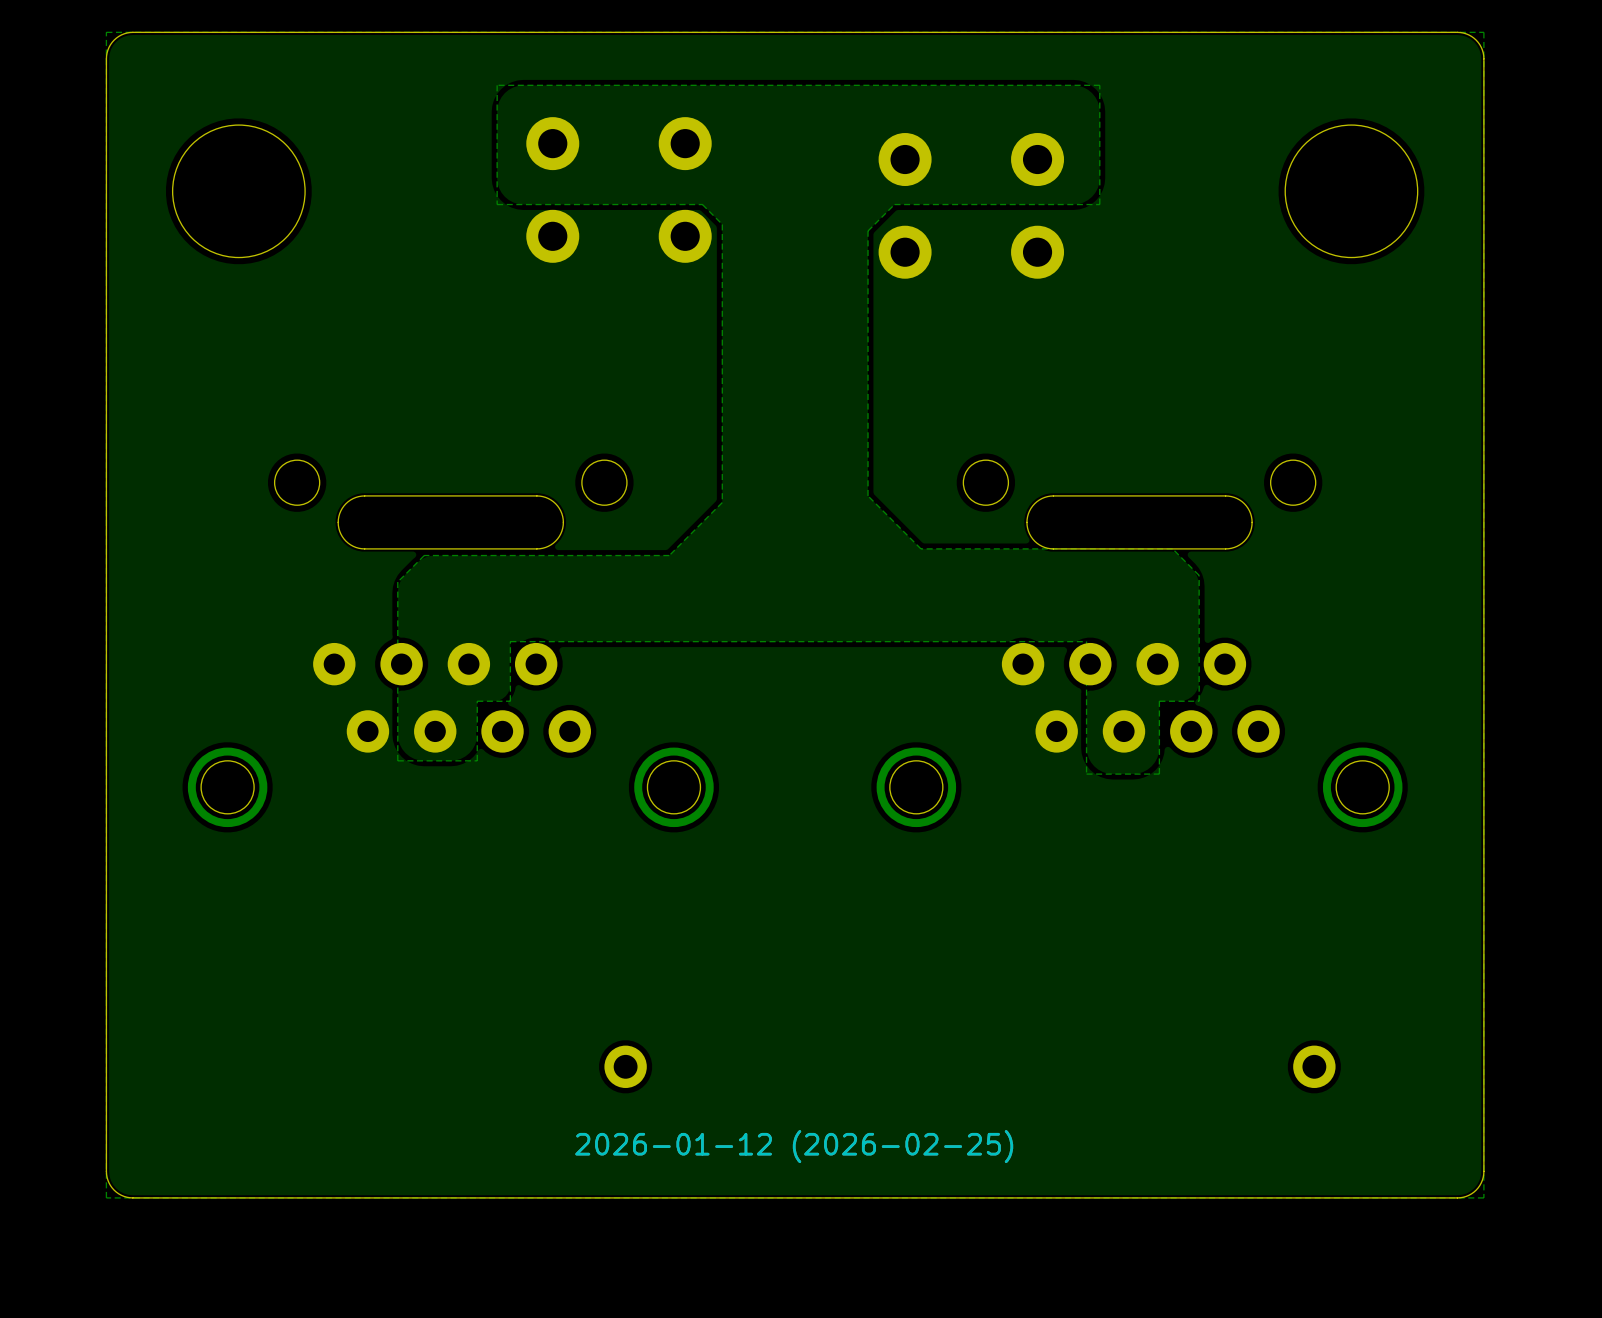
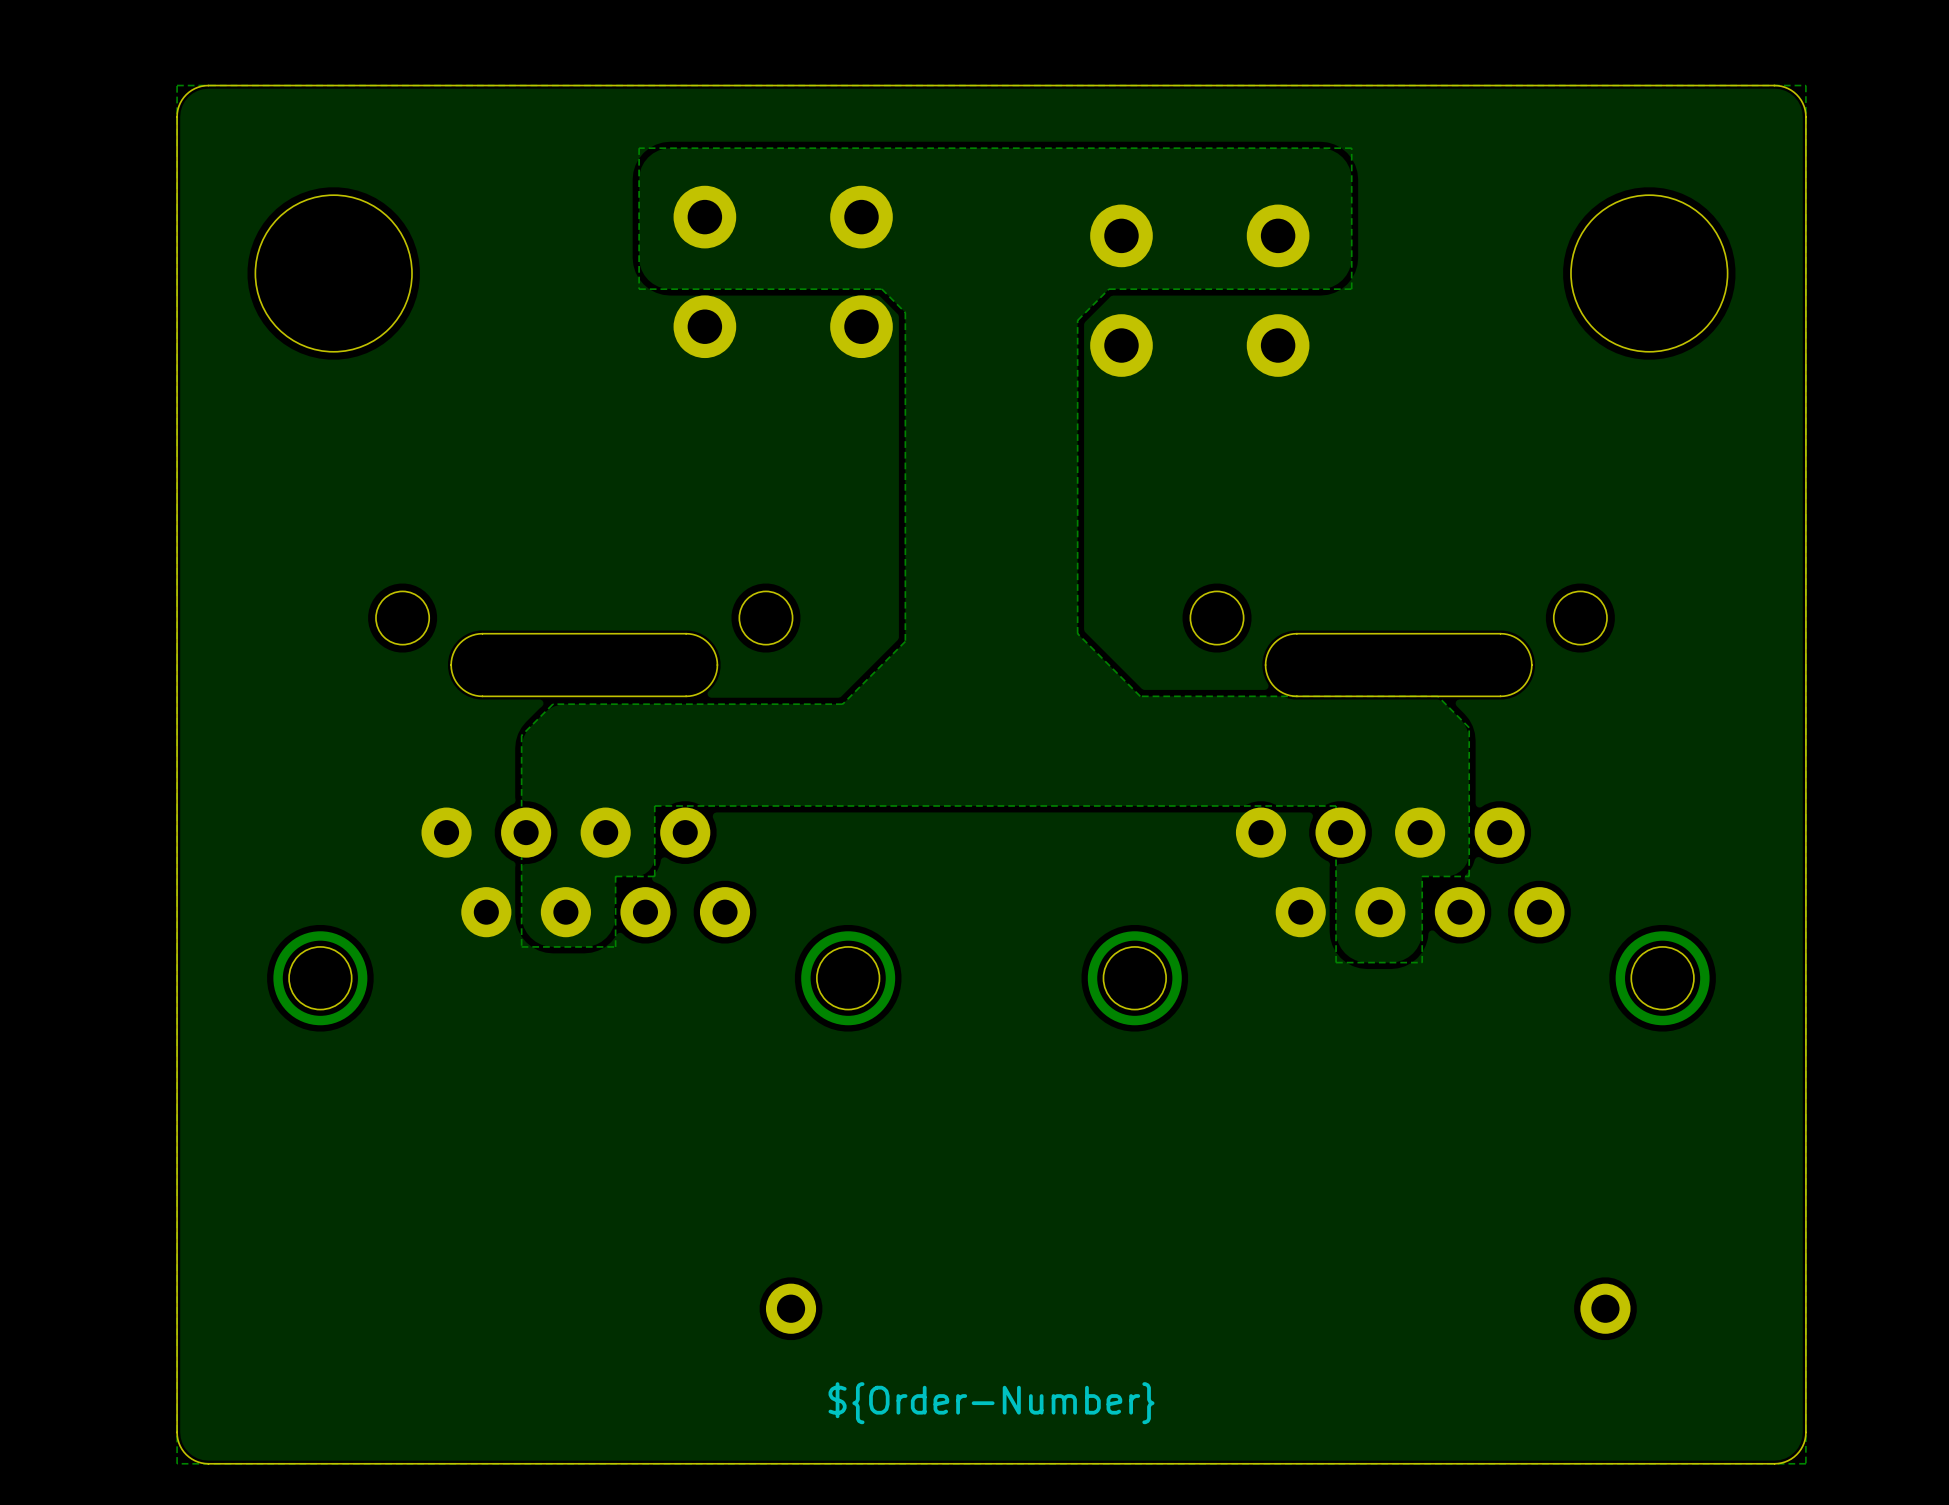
drawing shape: [575, 1130, 1014, 1164] -> [828, 1382, 1155, 1425]

